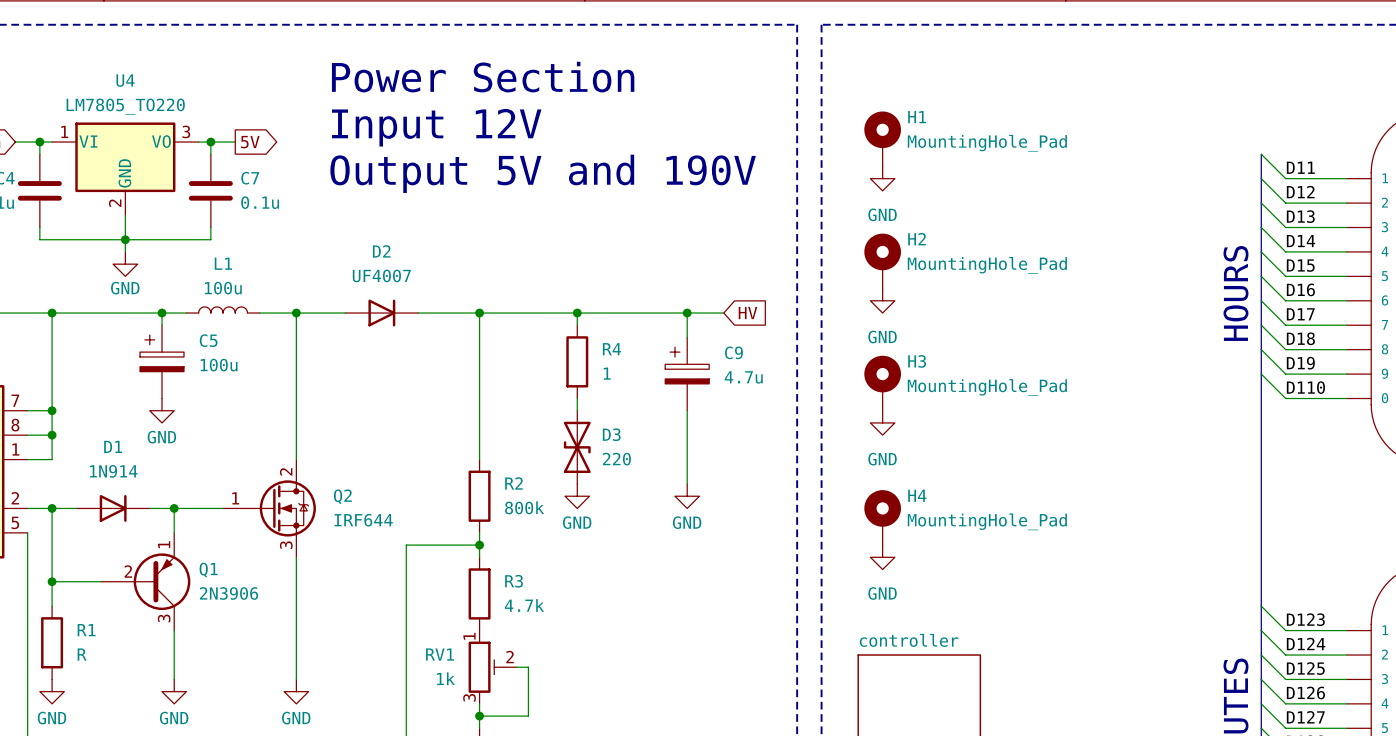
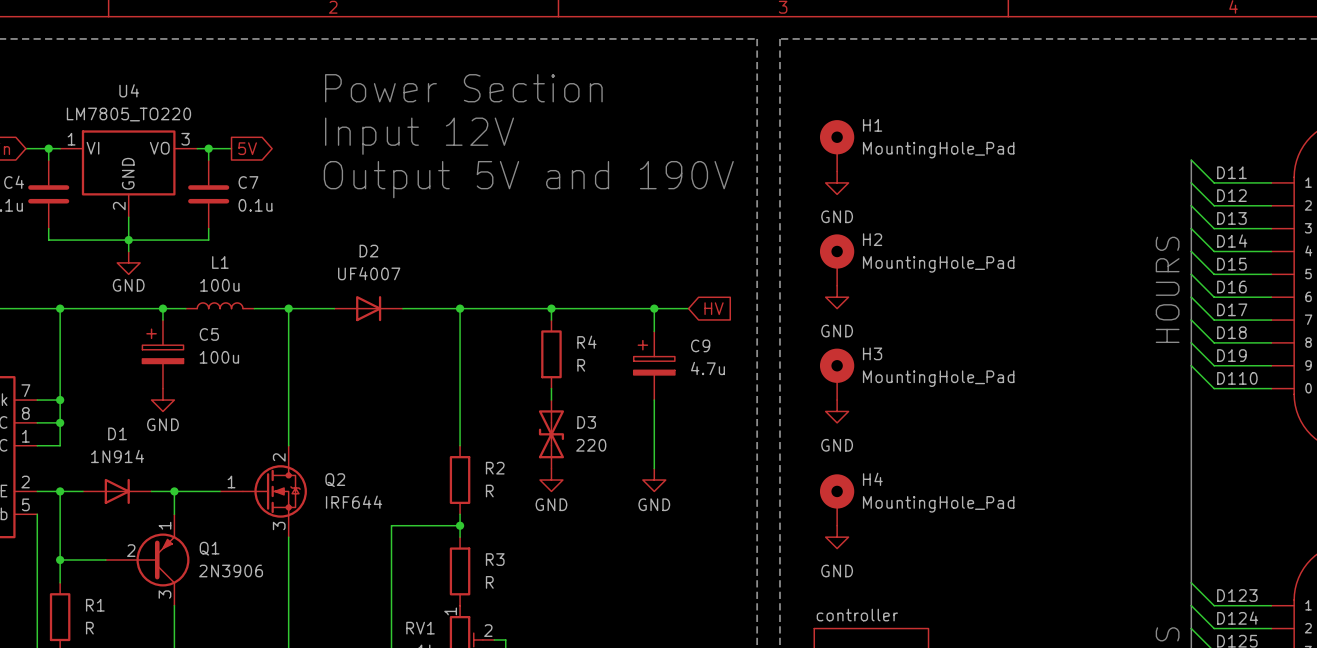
R4 value: 1 (607, 373) -> R (581, 365)
R2 value: 800k (524, 507) -> R (489, 491)
R3 value: 4.7k (524, 605) -> R (489, 582)

